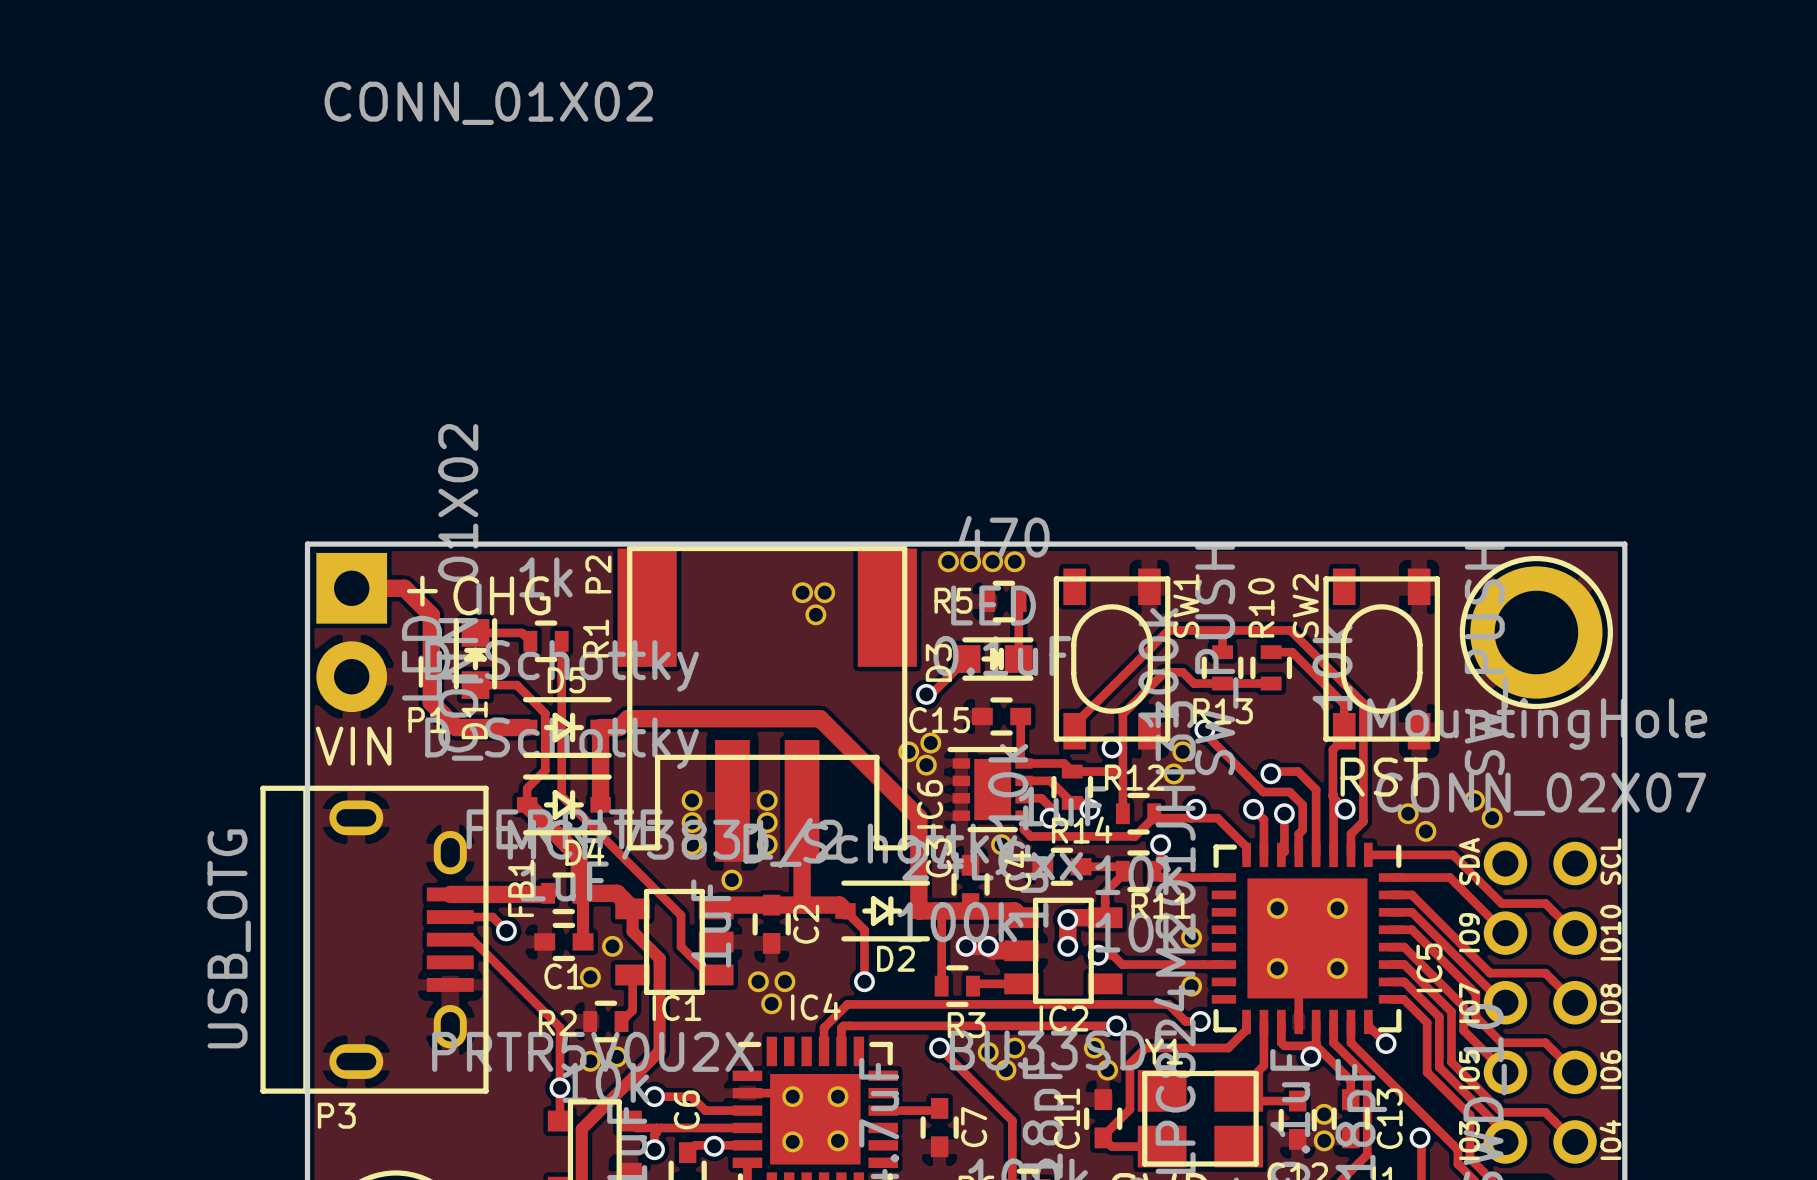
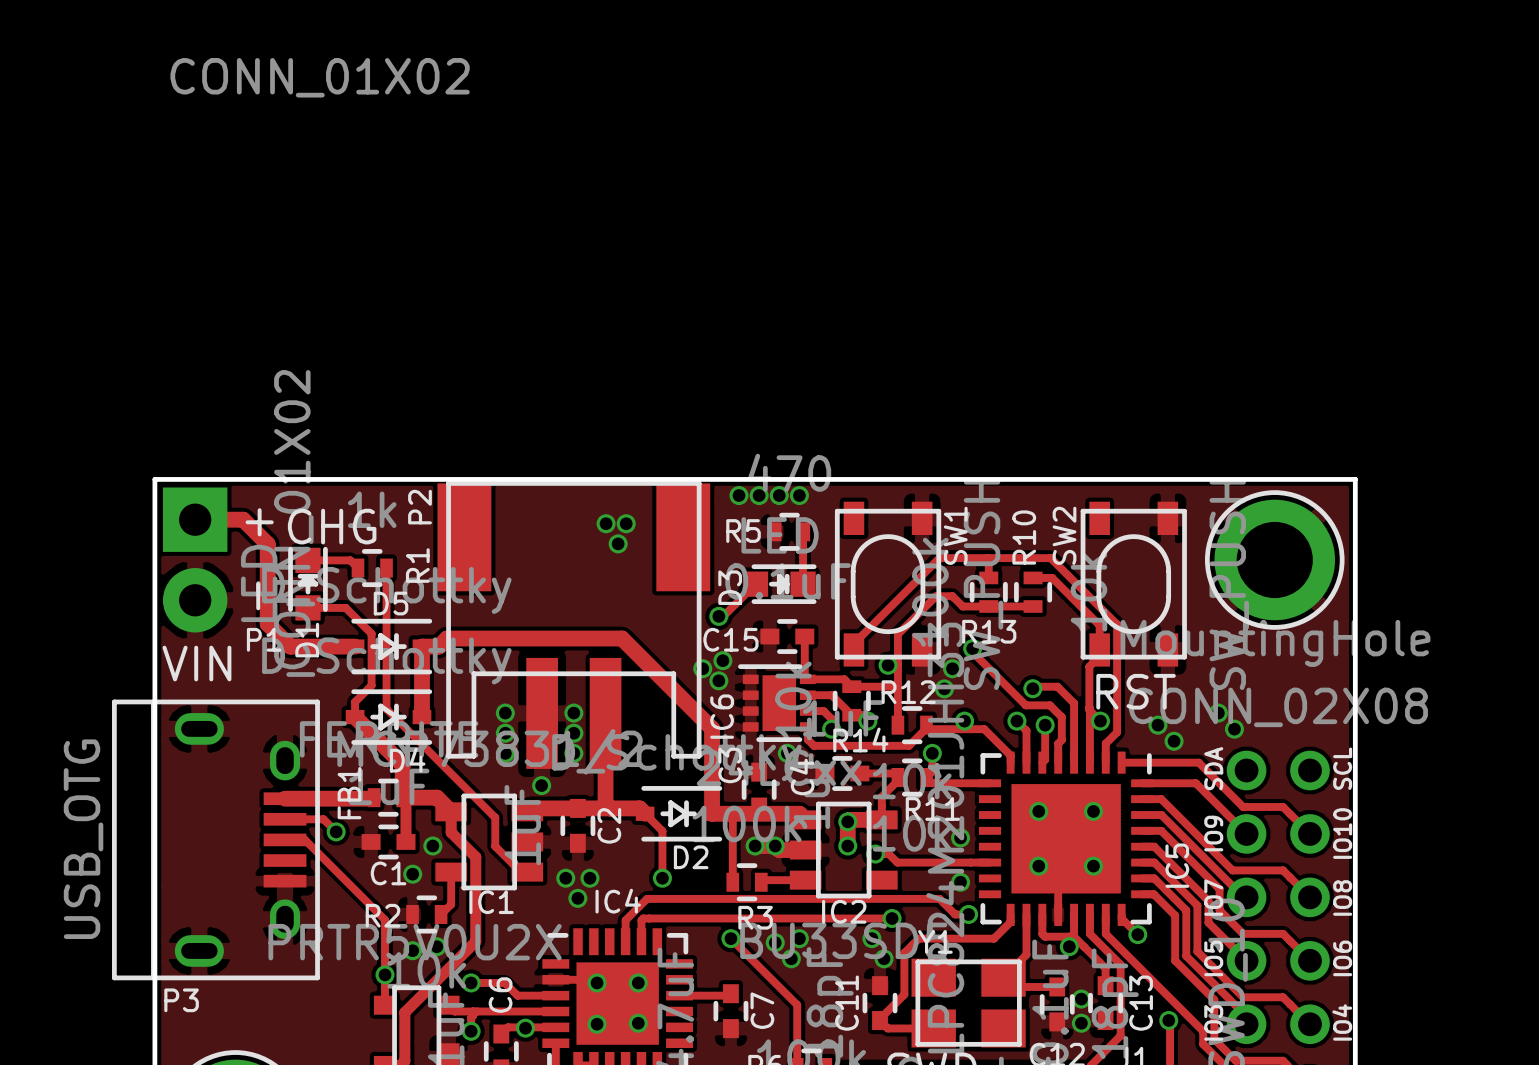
part value: CONN_02X07 (1541, 794) -> CONN_02X08 (1278, 707)

